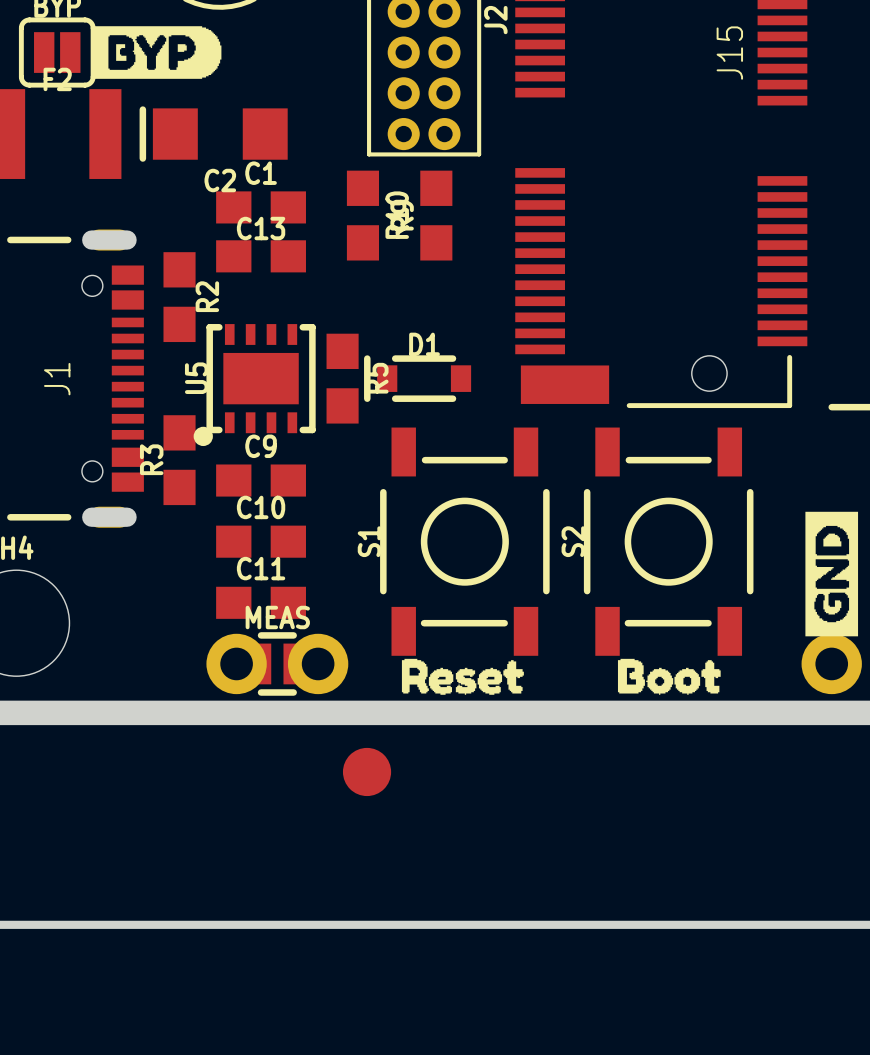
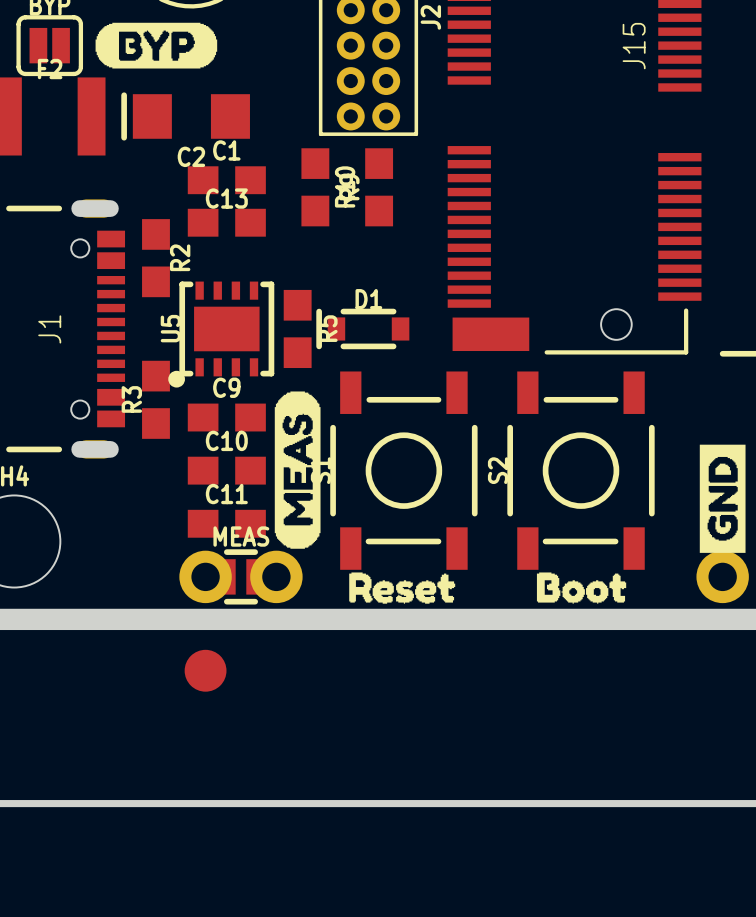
drawing shape: [94, 26, 222, 79] -> [95, 22, 218, 69]
drawing: none -> [274, 391, 321, 549]
part position: (367, 771) -> (205, 670)

